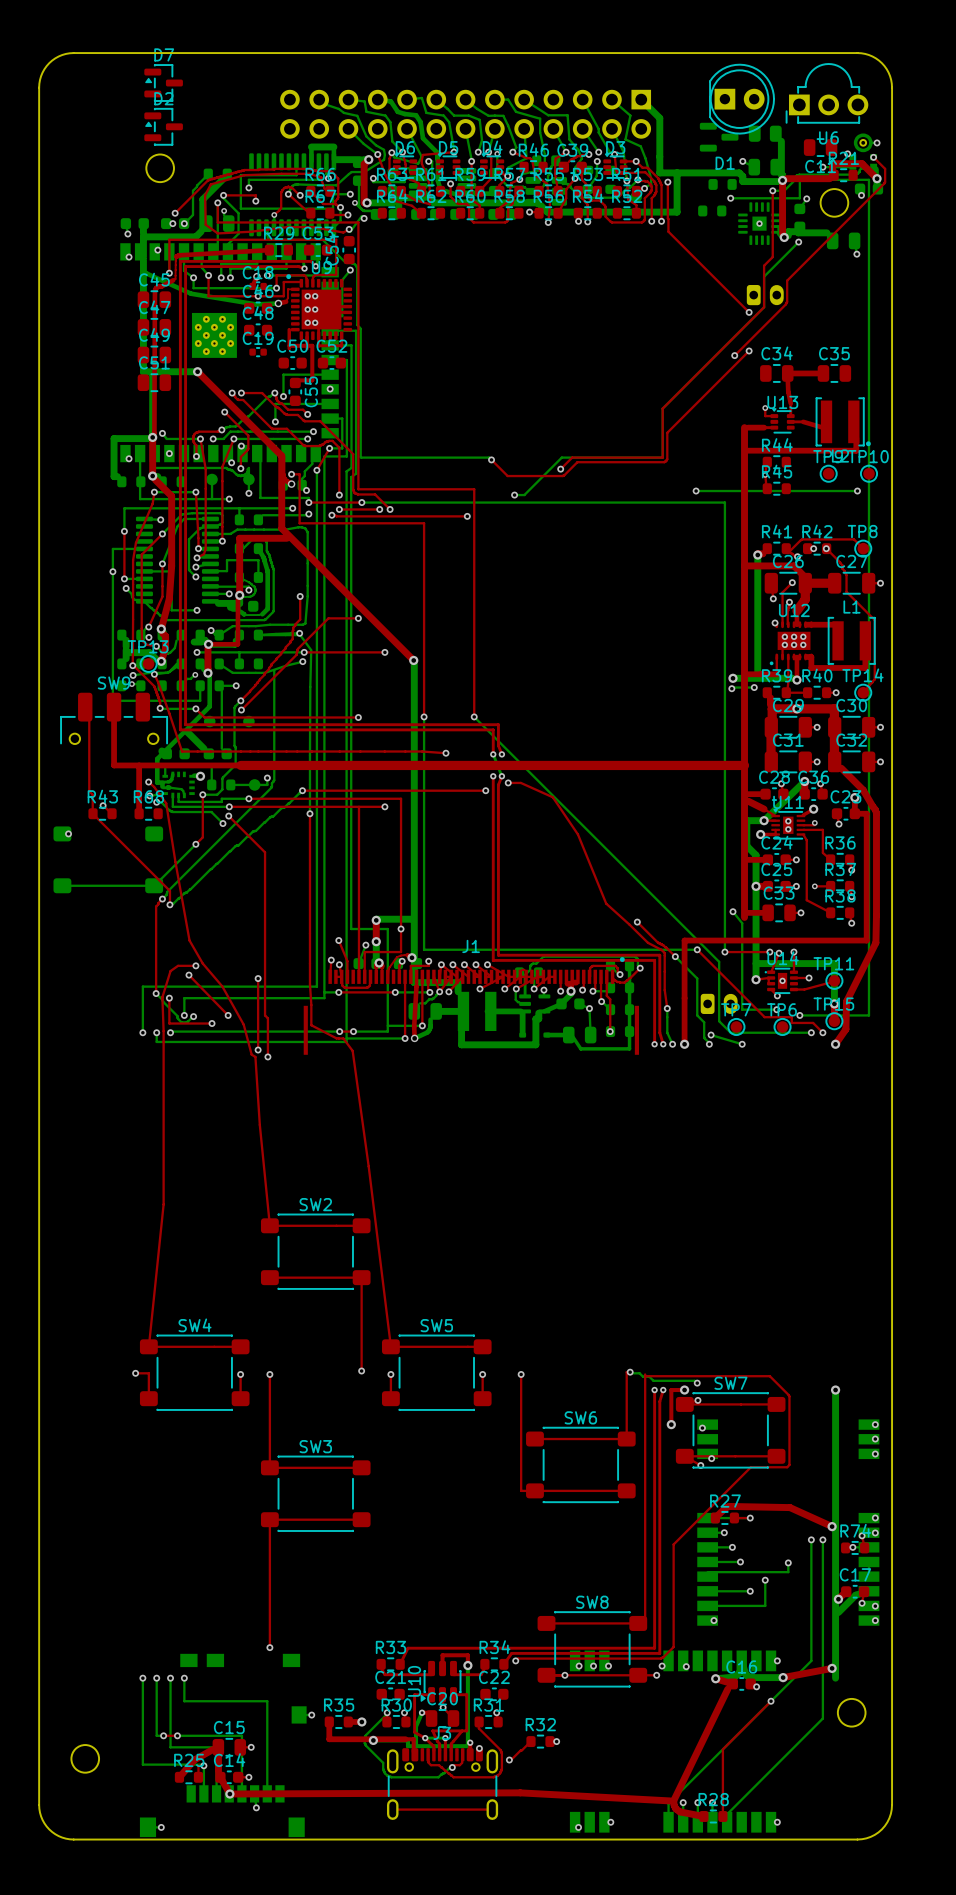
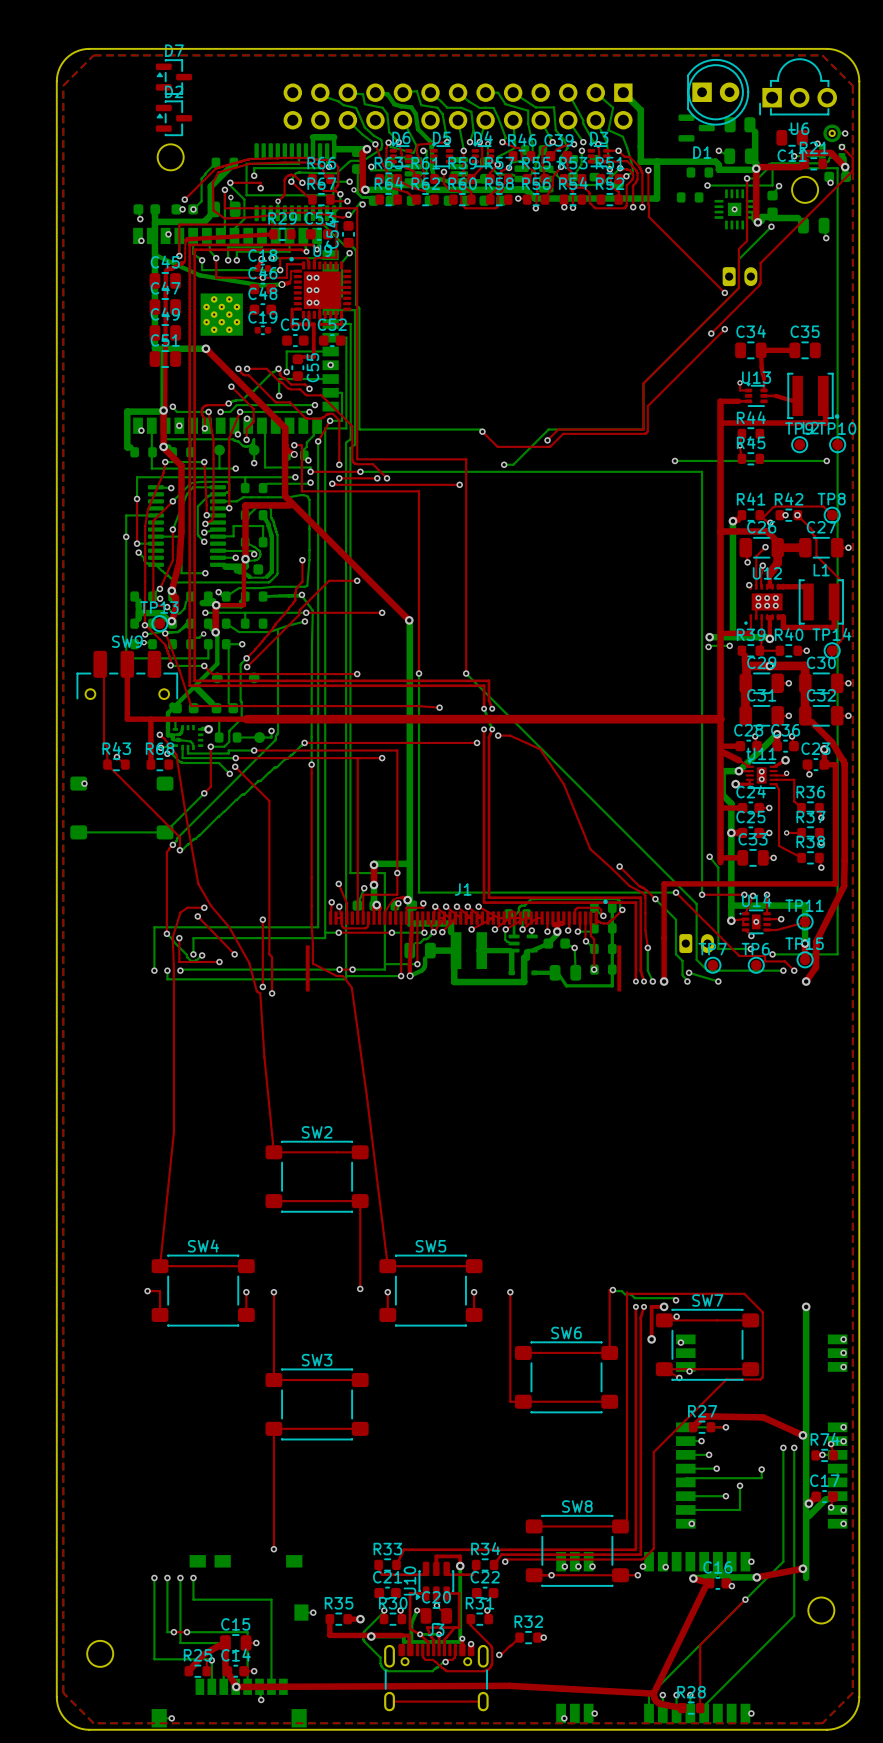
top zone outline: none -> (93, 55) (63, 85) (63, 1692) (93, 1723) (822, 1723) (852, 1692) (852, 85) (822, 55) (93, 55)

